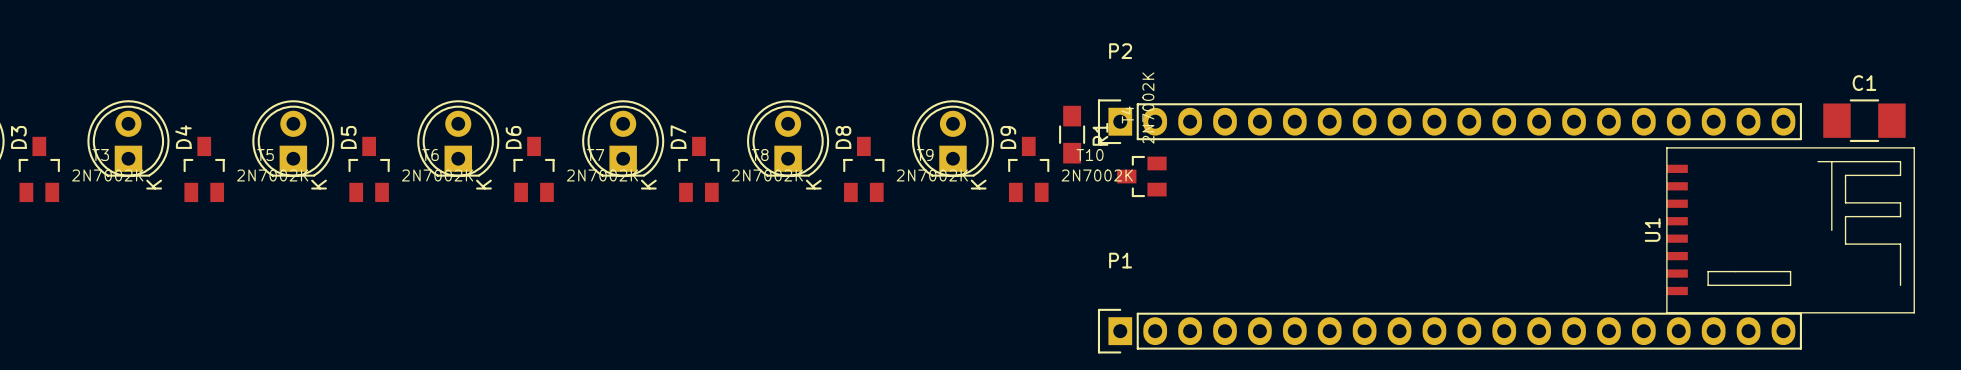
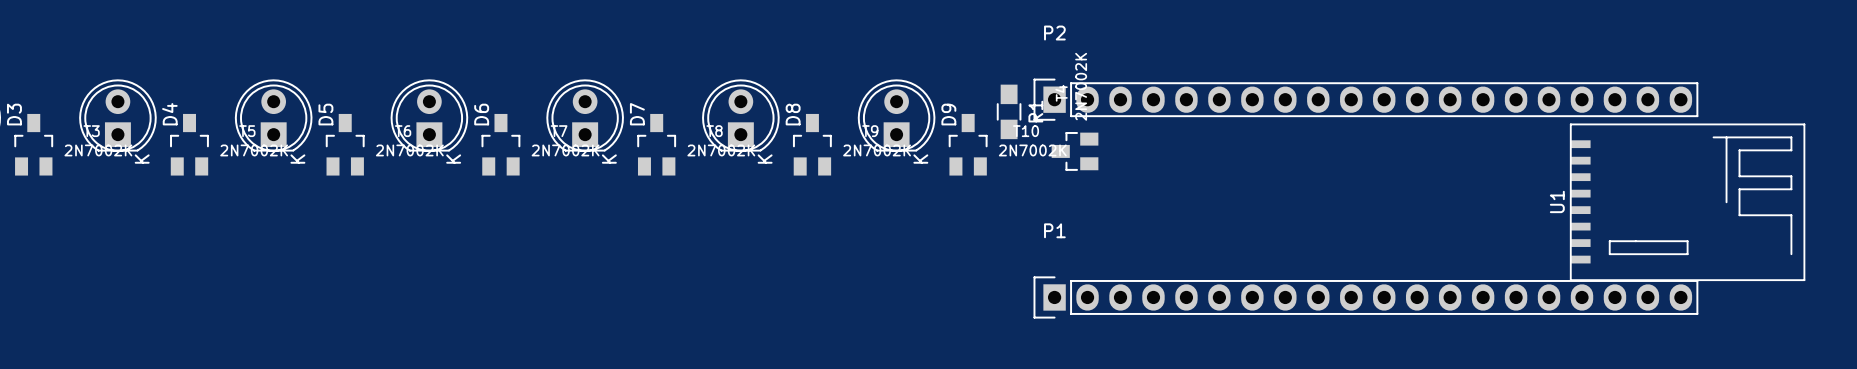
C1: (1864, 120) -> none

